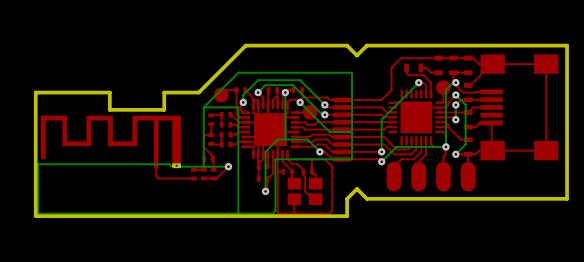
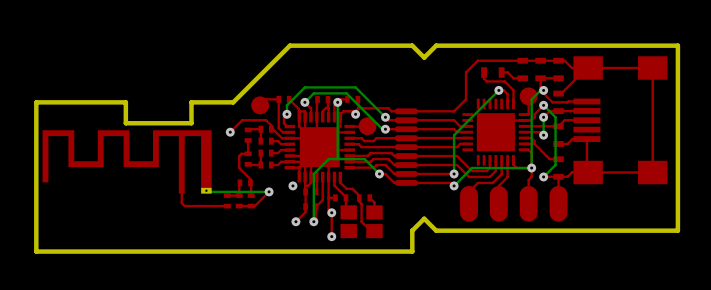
bottom track: (300, 102) (329, 132) (352, 132) -> none
bottom track: (203, 107) (238, 107) (238, 213) -> none
bottom track: (203, 107) (203, 166) -> none
bottom track: (203, 107) (238, 72) (352, 72) (352, 159) (275, 159) (275, 211) (272, 213) (38, 213) (38, 164) (176, 165) -> none
top track: none -> (271, 129) (271, 125) (266, 120) (242, 120) (230, 132)
via: none -> (230, 132)
top track: (295, 159) (324, 159) (332, 166) (332, 210) (329, 213) (277, 213) (277, 181) -> (331, 236) (331, 212) (328, 209)
top track: (311, 159) (311, 171) -> none
via: none -> (292, 185)
top track: none -> (305, 206) (305, 212) (295, 221)
via: none -> (331, 212)
via: none -> (295, 221)
top track: (294, 199) (294, 213) -> none
via: none -> (331, 236)

